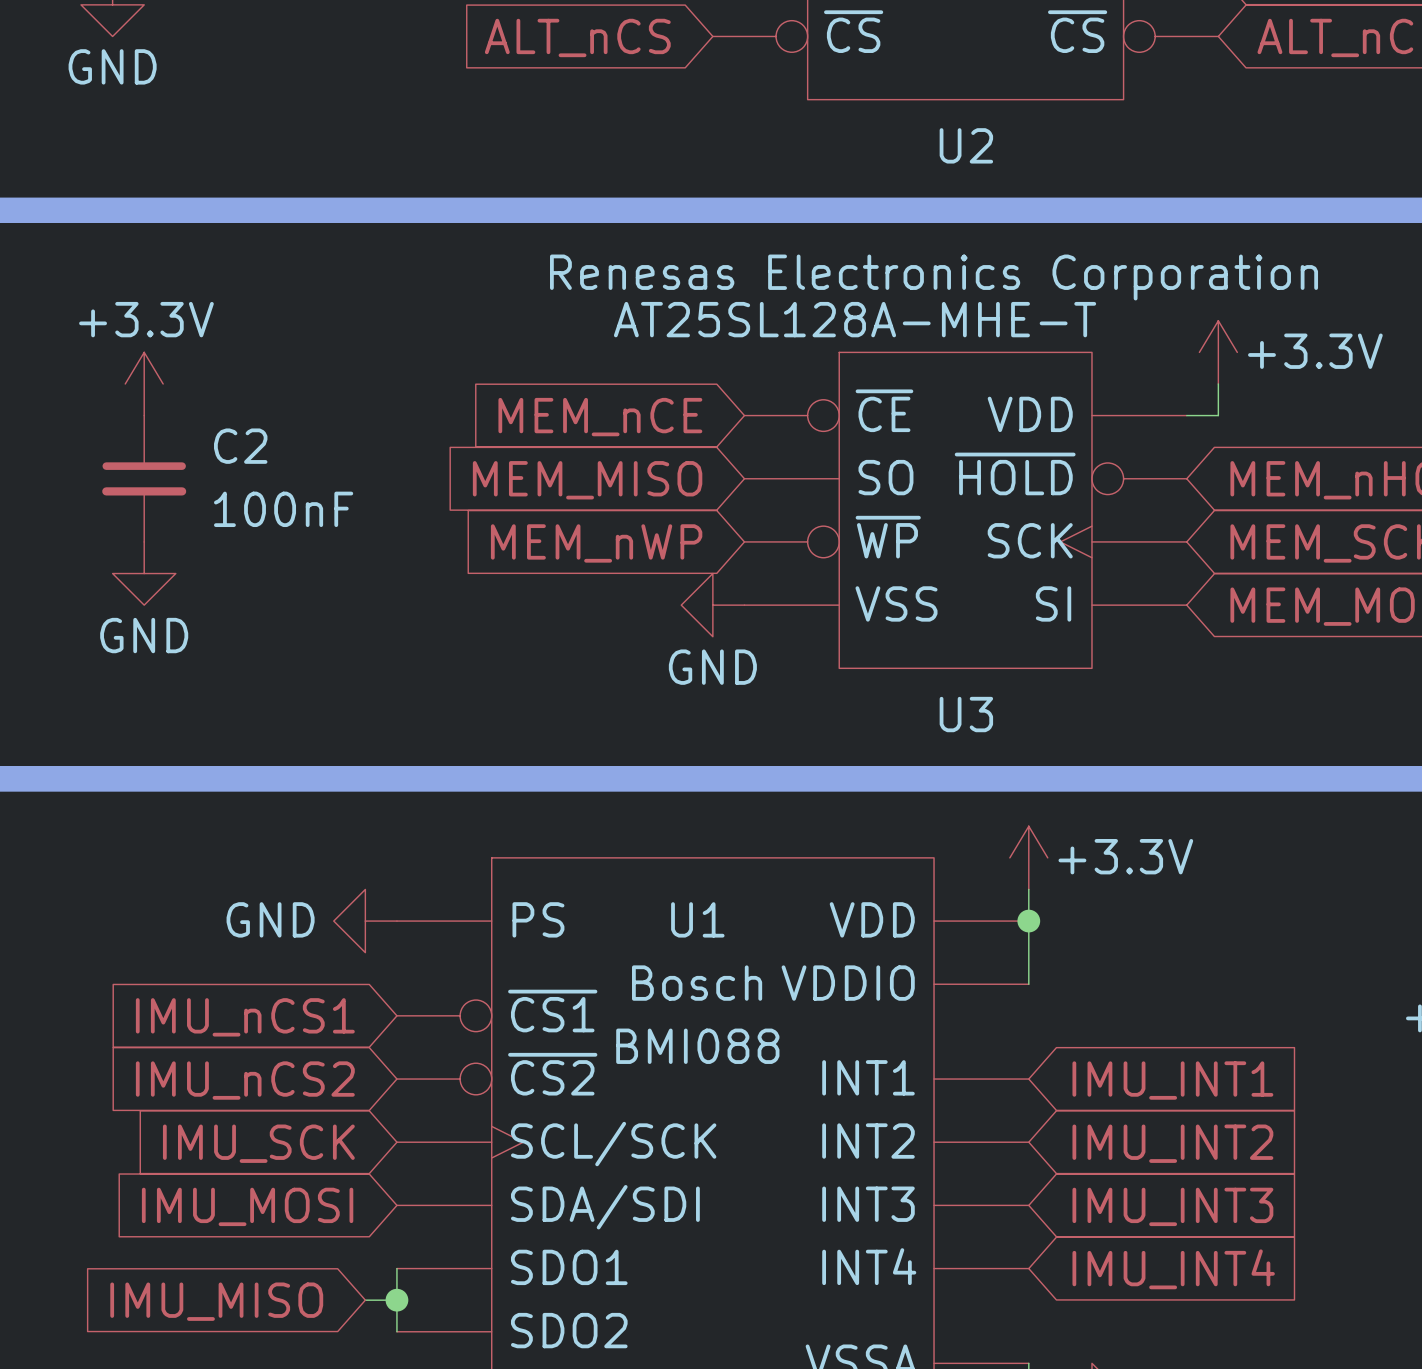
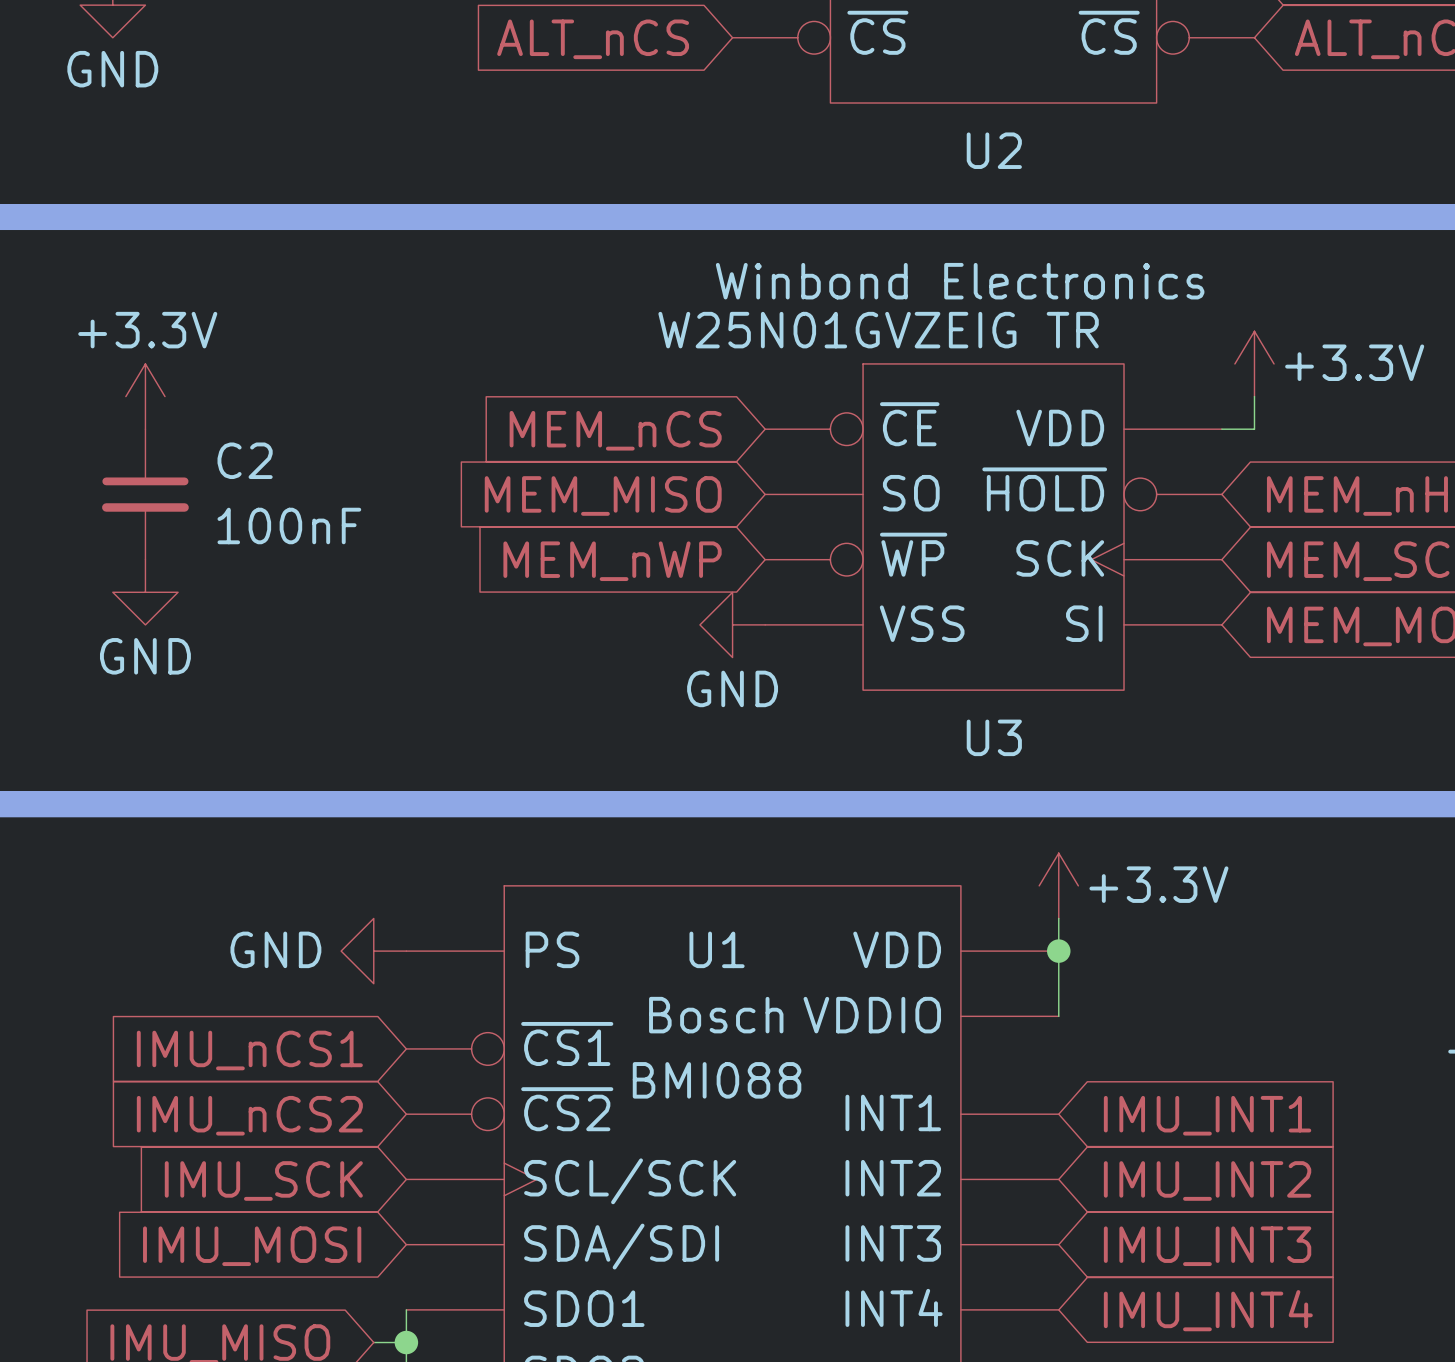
U3 text: Renesas Electronics Corporation (934, 277) -> Winbond Electronics (960, 281)
U3 text: AT25SL128A-MHE-T (855, 319) -> W25N01GVZEIG TR (878, 330)
global label: MEM_nCE (600, 417) -> MEM_nCS (615, 430)

